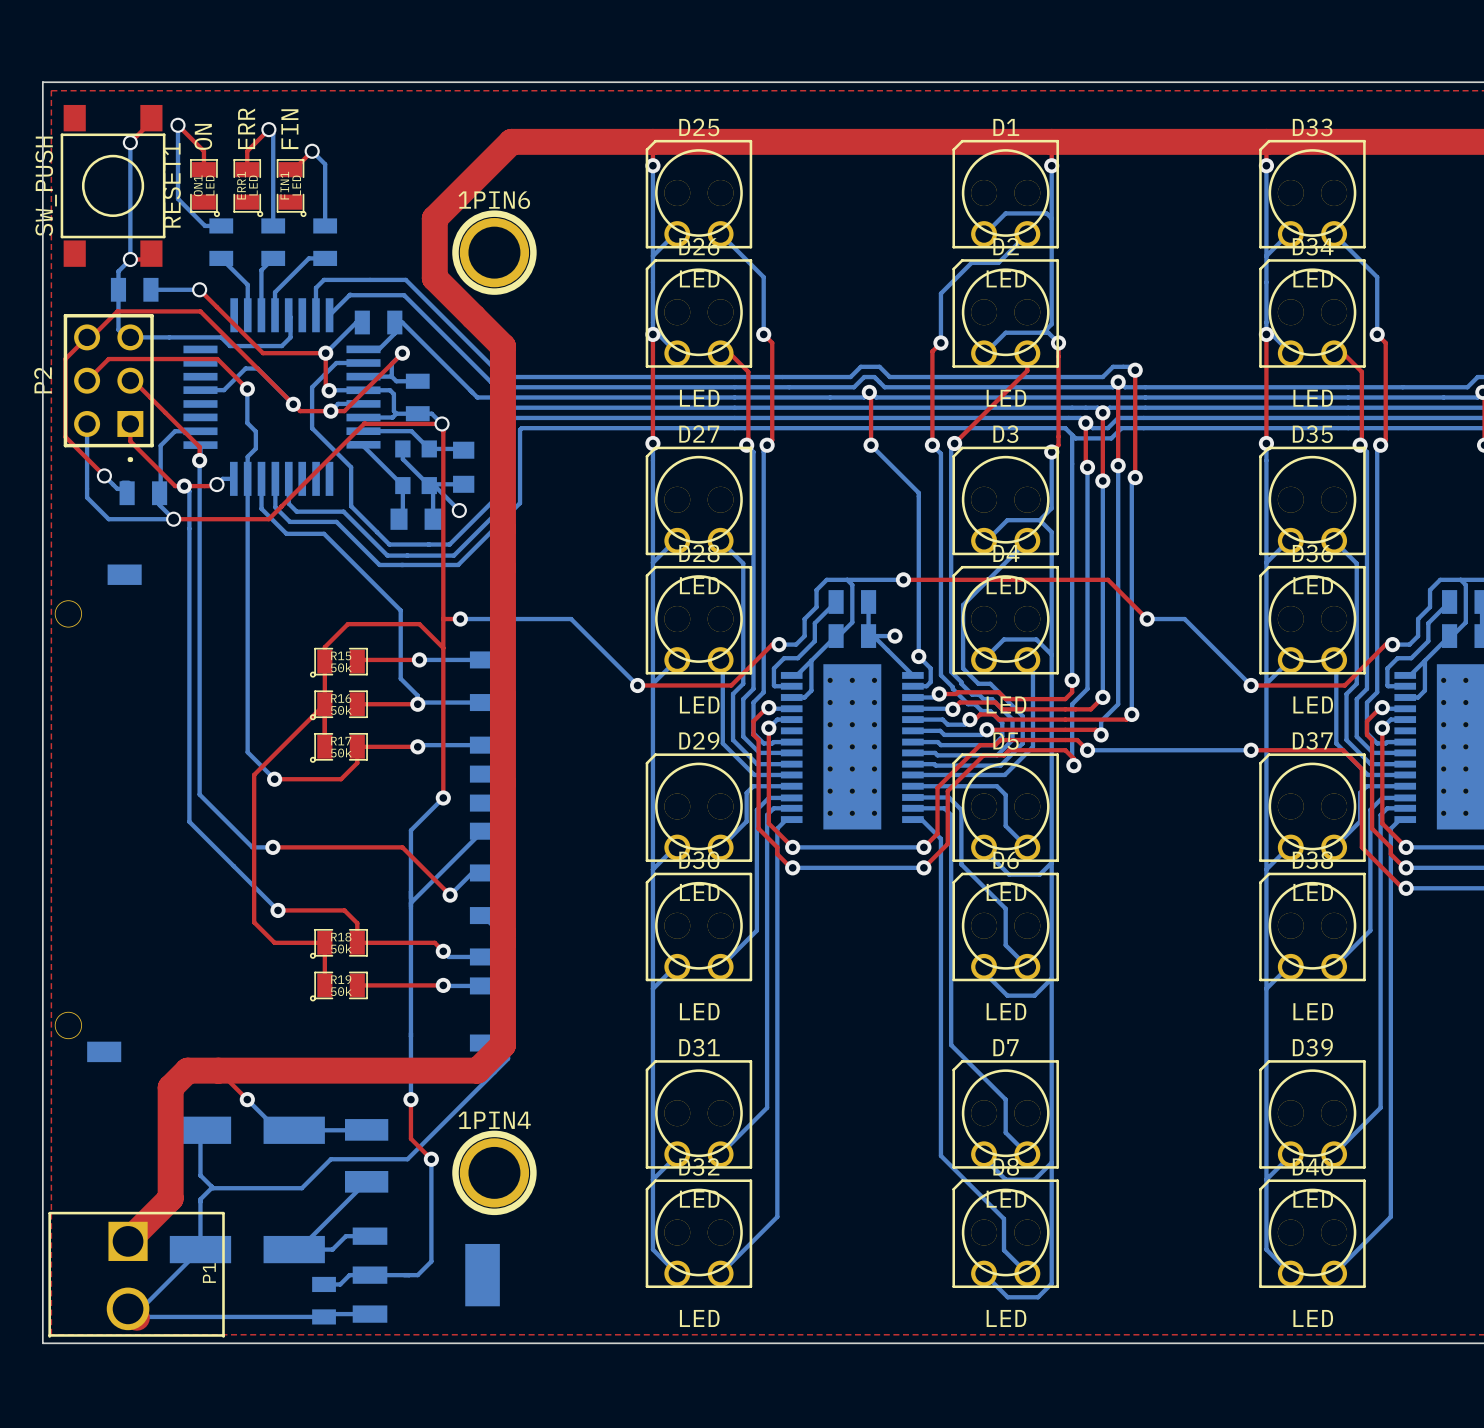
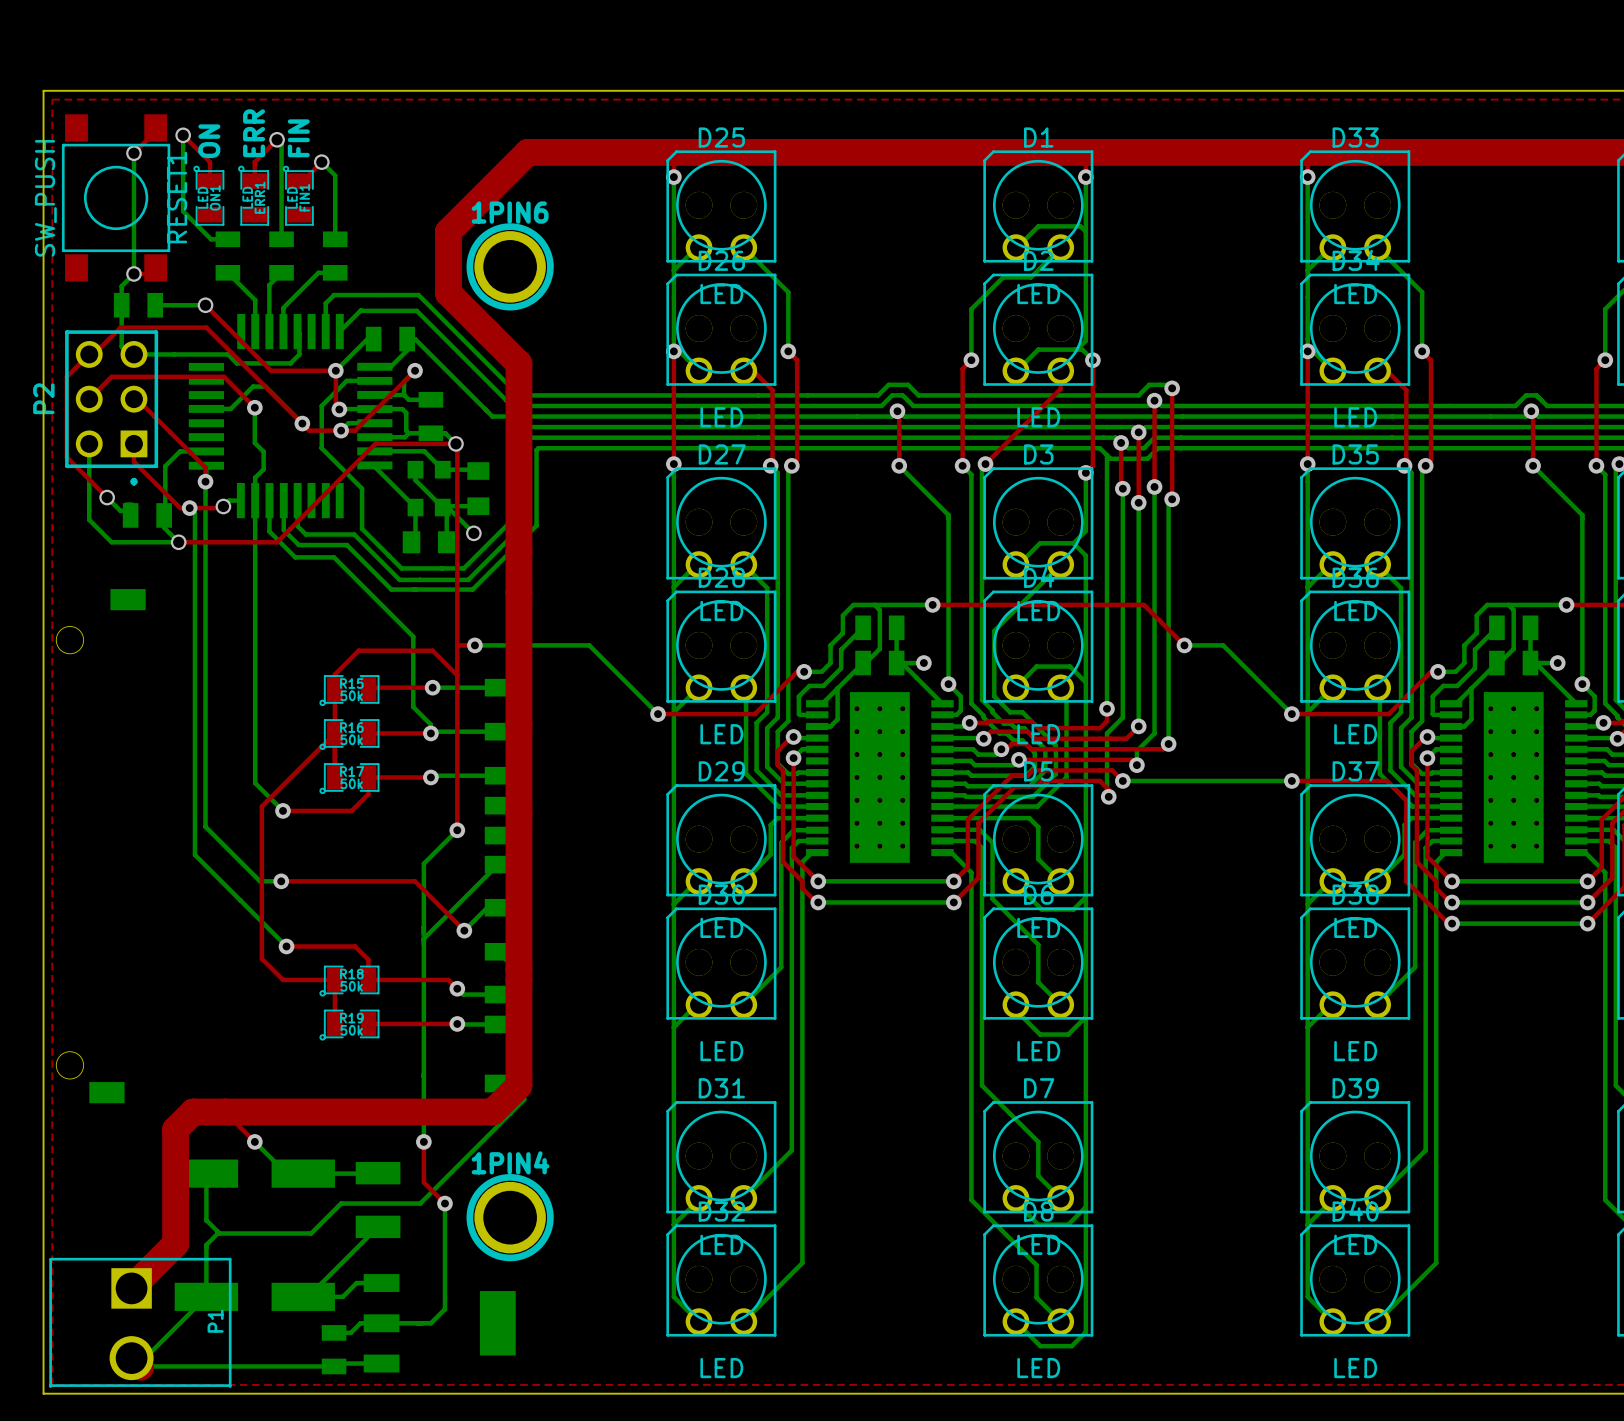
ON1 rotation: 0° (205, 188) -> 180° (208, 195)
ERR1 rotation: 0° (248, 188) -> 180° (253, 195)
FIN1 rotation: 0° (291, 188) -> 180° (298, 195)

